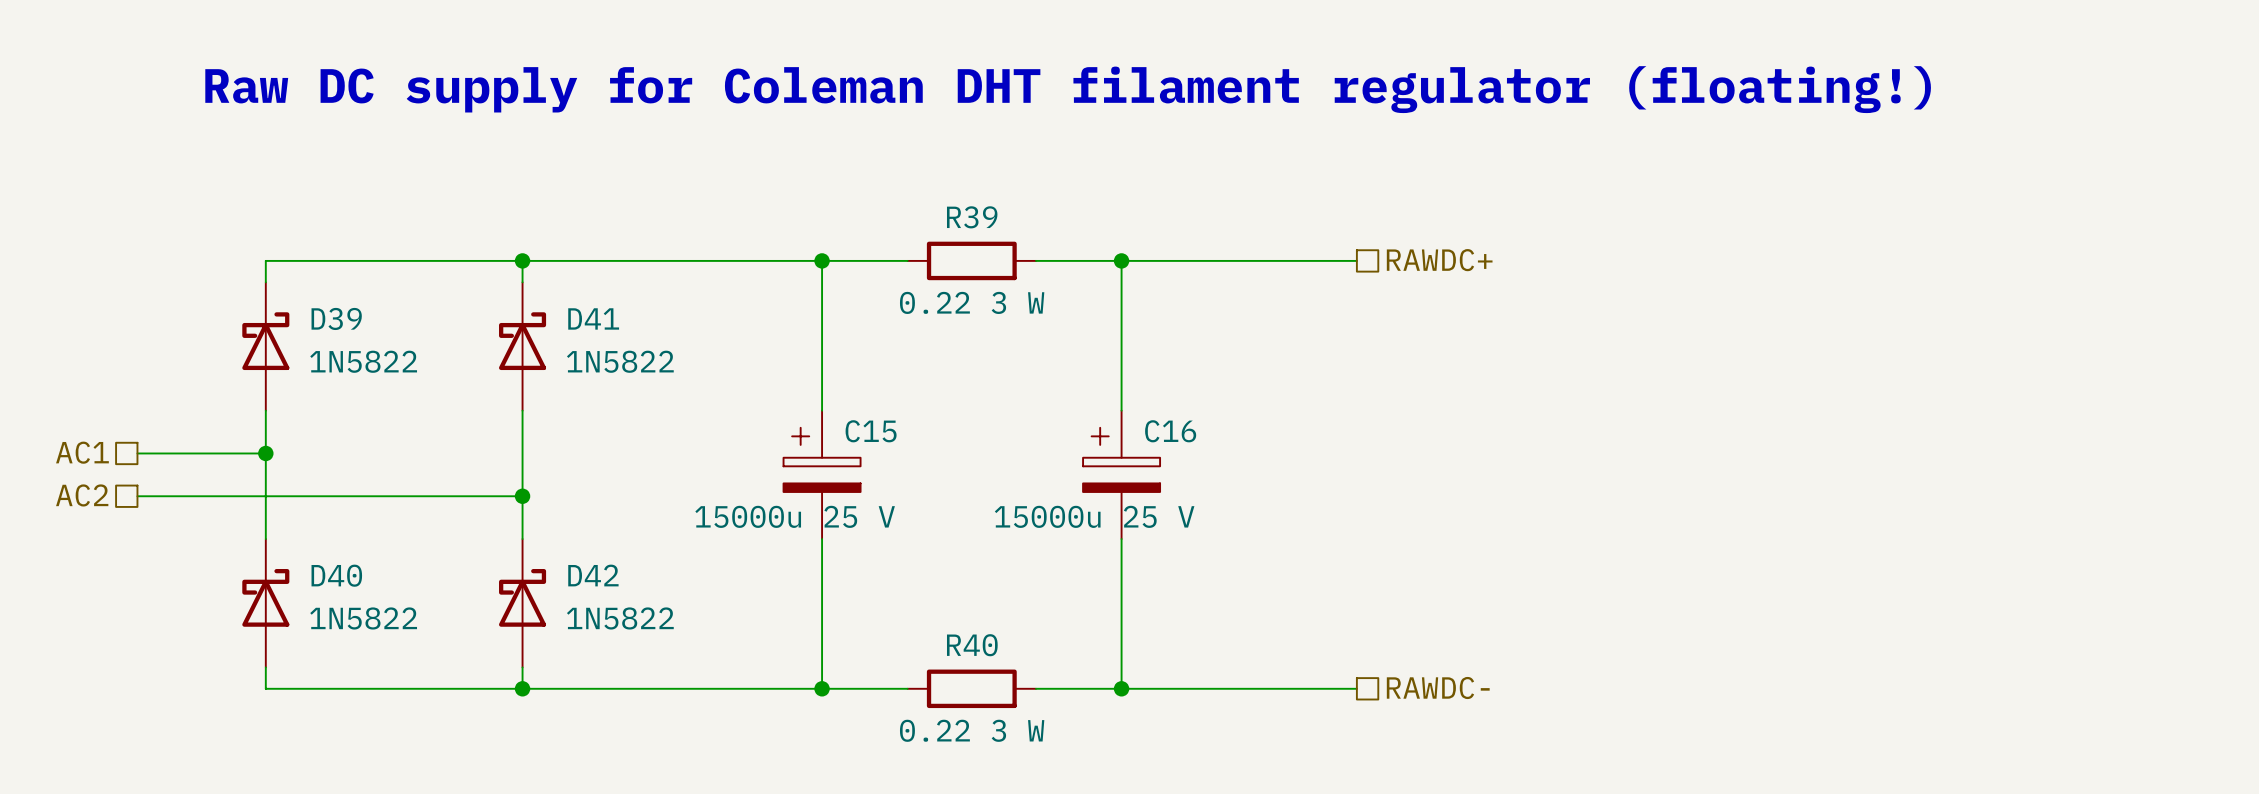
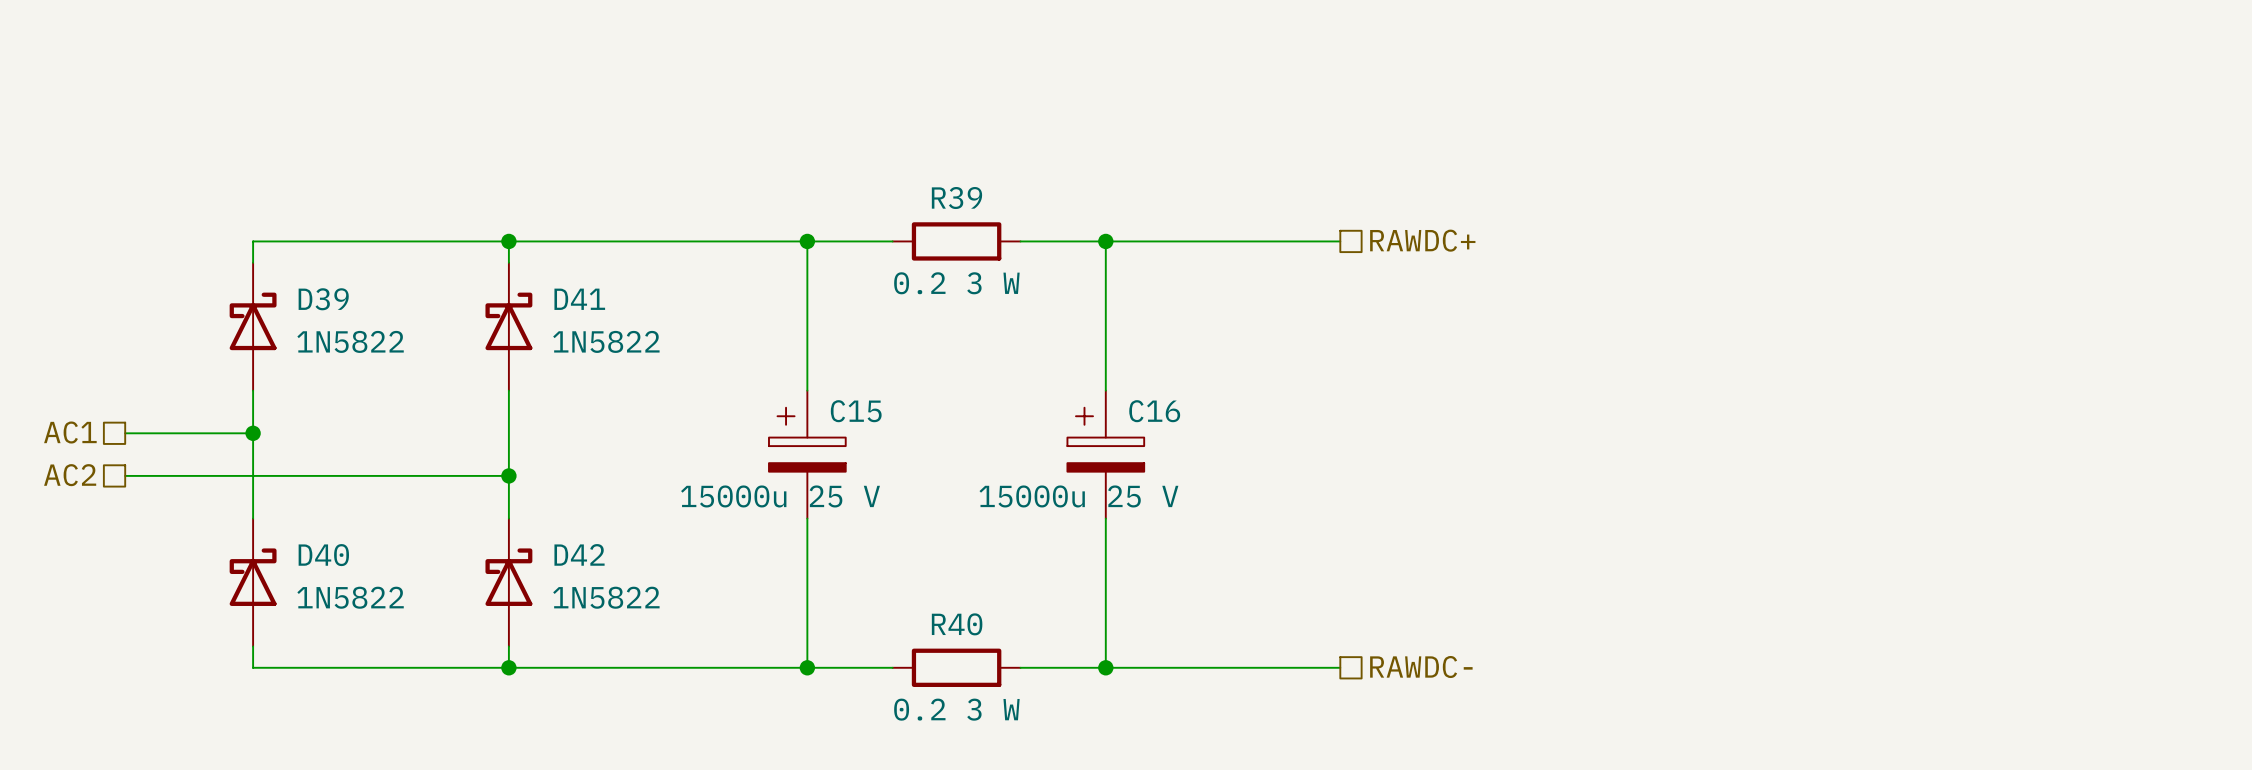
text: Raw DC supply for Coleman DHT filament regulator (floating!) (1068, 89) -> none
R39 value: 0.22 3 W (972, 302) -> 0.2 3 W (956, 283)
R40 value: 0.22 3 W (972, 730) -> 0.2 3 W (956, 709)

